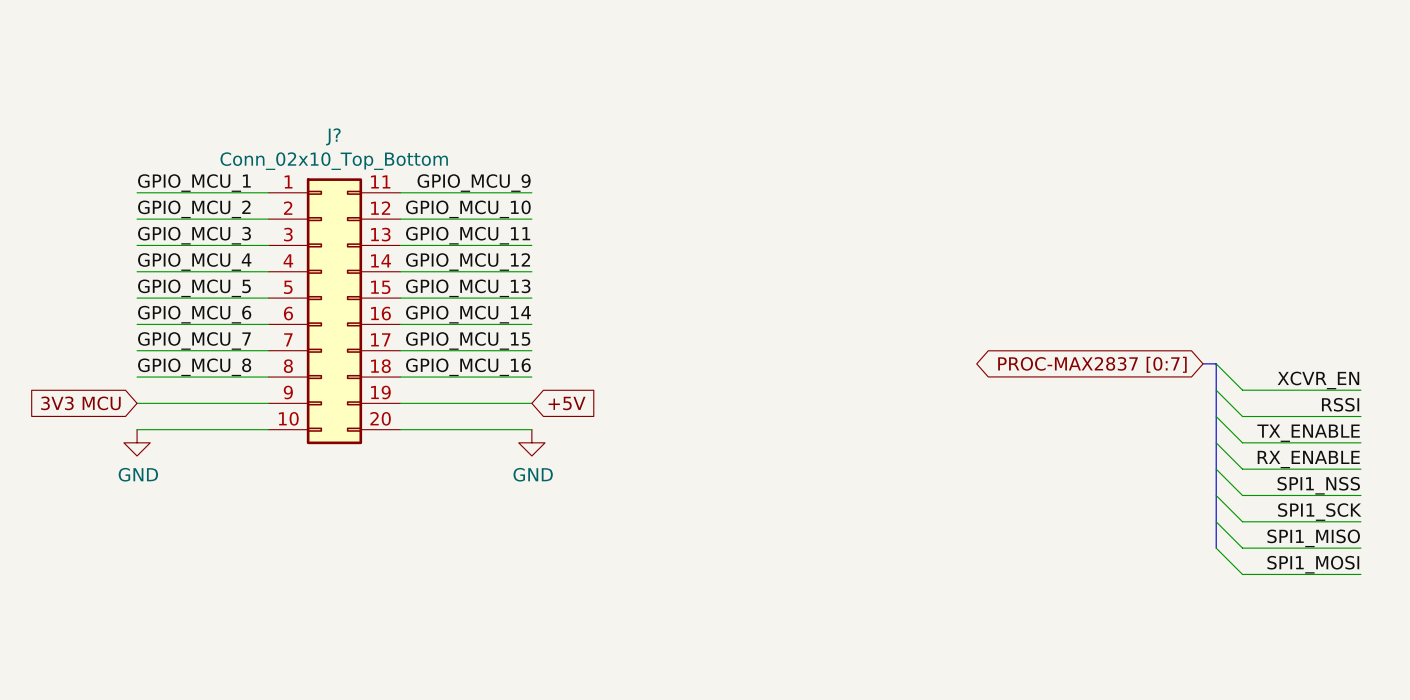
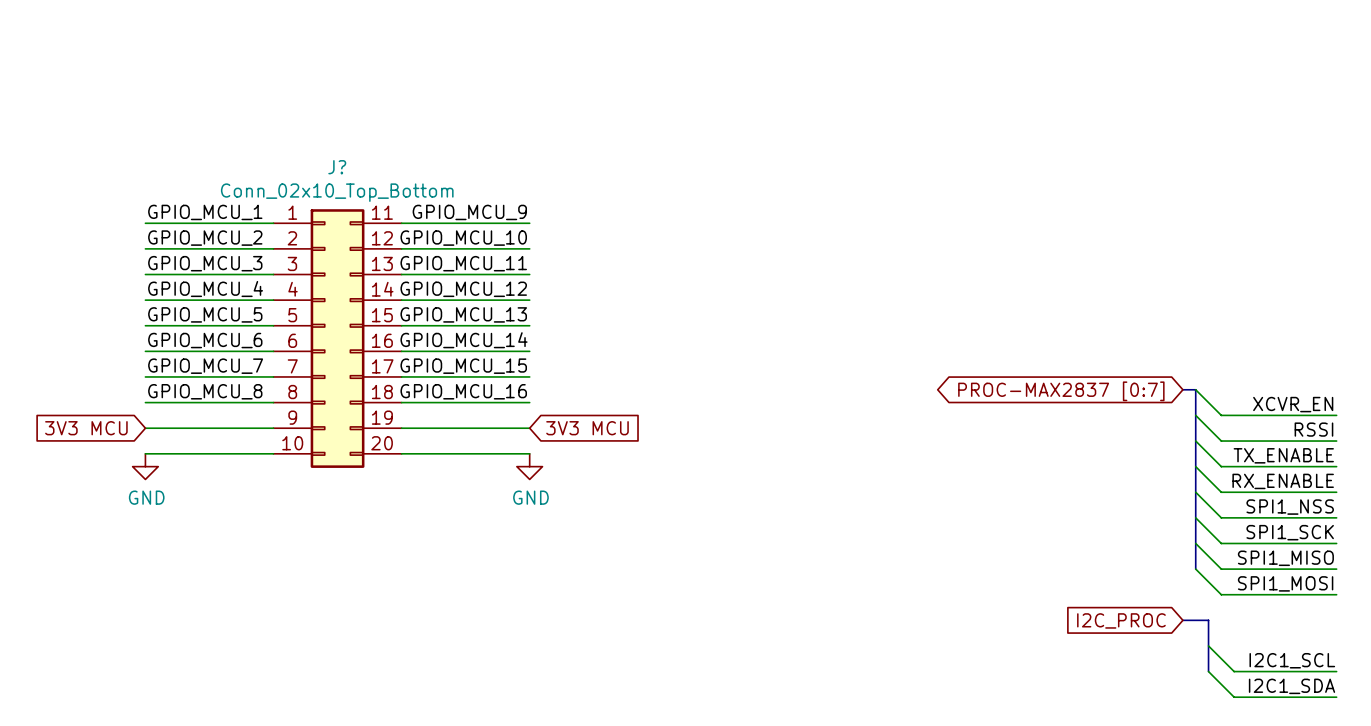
global label: +5V (567, 403) -> 3V3 MCU (587, 428)
bus: none -> (1182, 620) (1208, 620) (1208, 671)
global label: none -> I2C_PROC (1121, 620)
wire: none -> (1208, 645) (1234, 671) (1336, 671)
label: none -> I2C1_SCL (1292, 660)
wire: none -> (1208, 671) (1234, 697) (1336, 697)
label: none -> I2C1_SDA (1292, 686)

